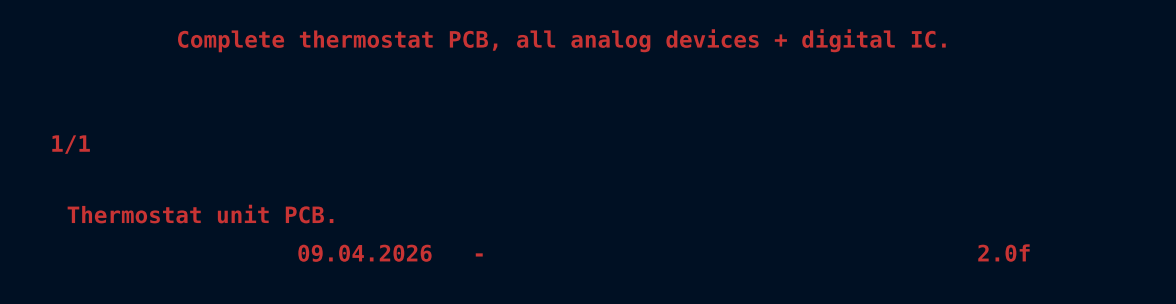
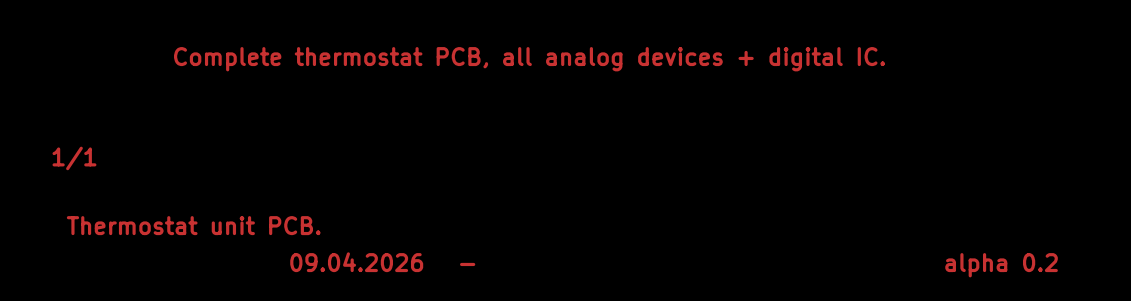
text: 2.0f (1003, 253) -> alpha 0.2 (1001, 265)

